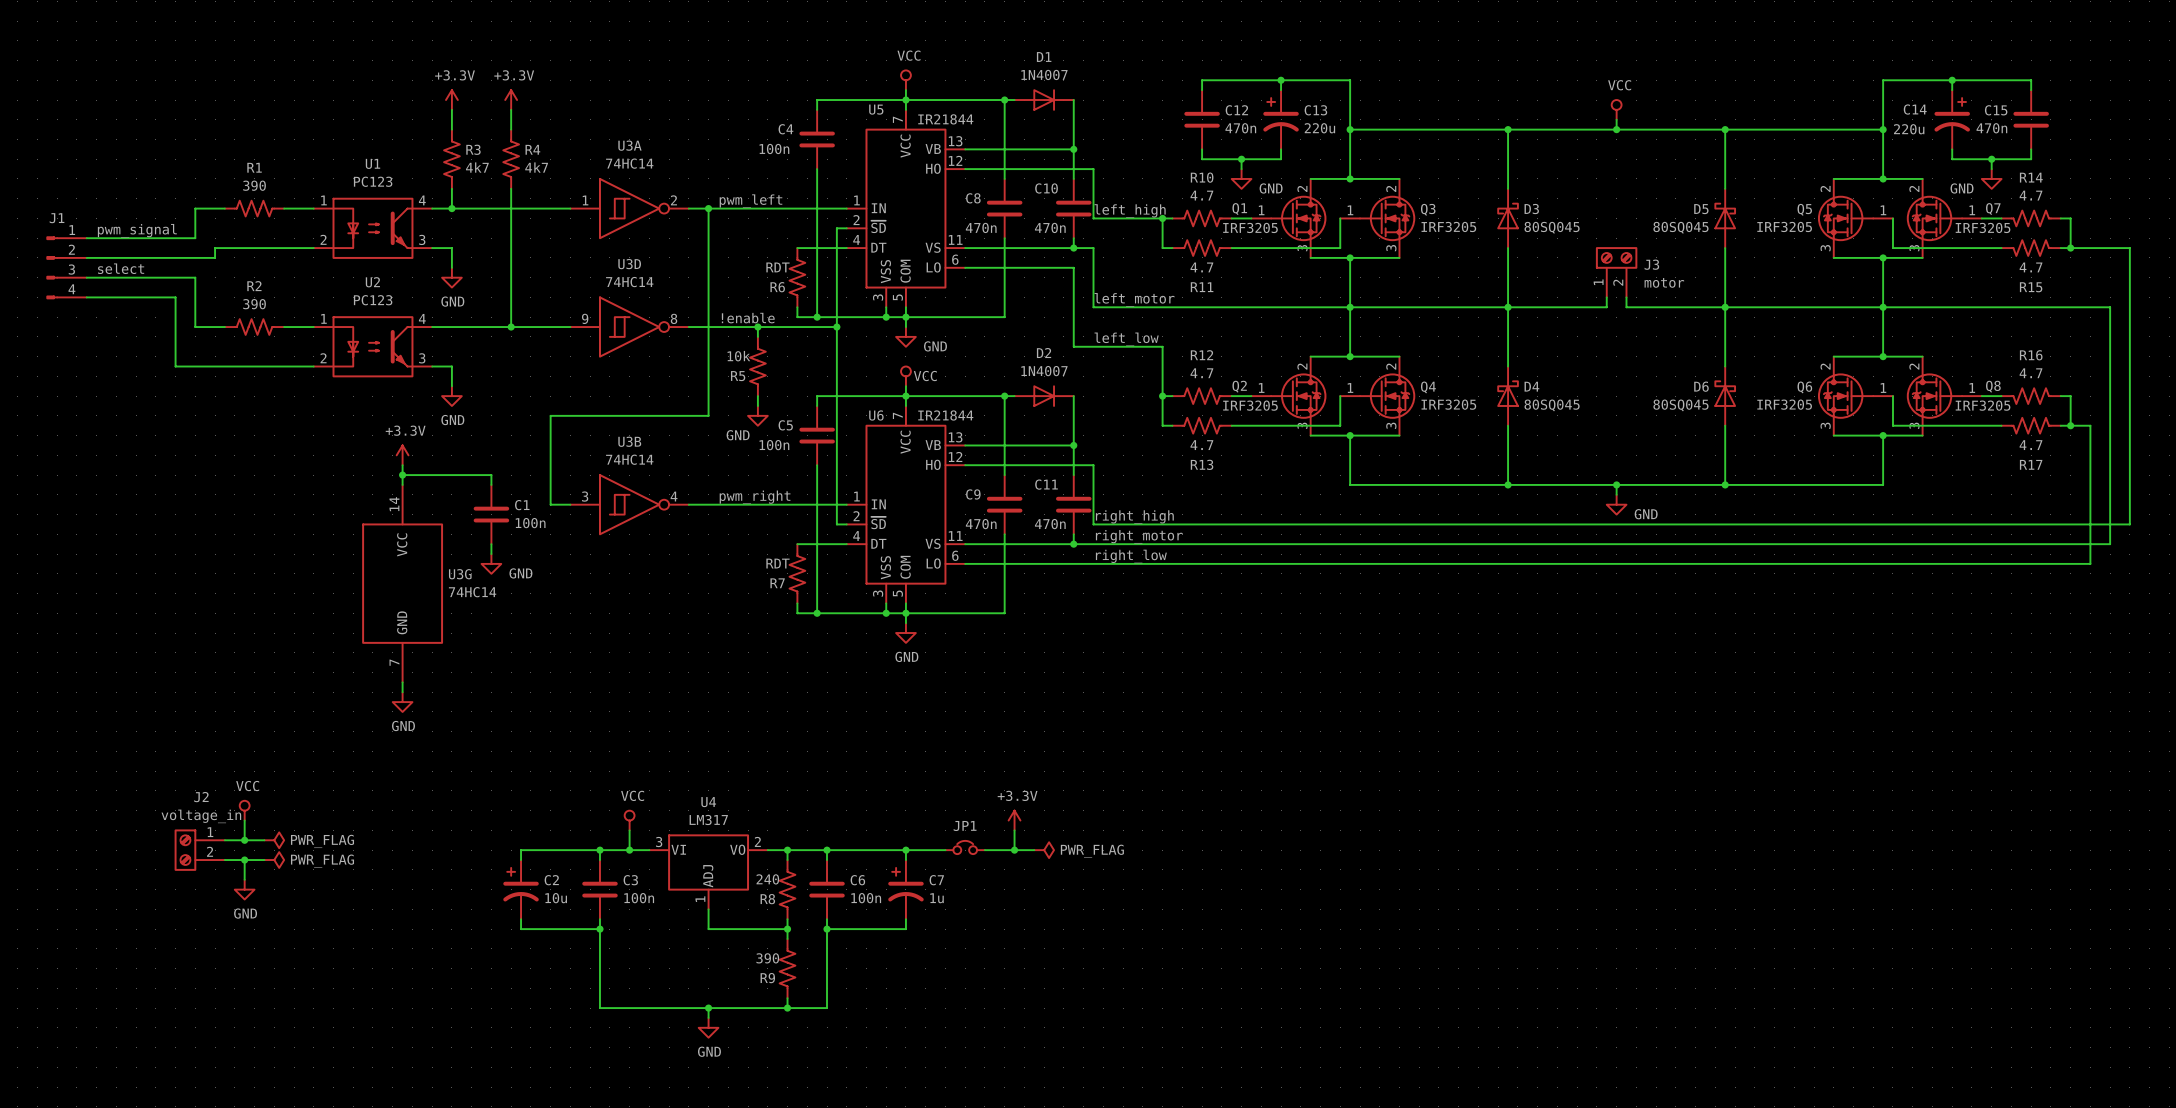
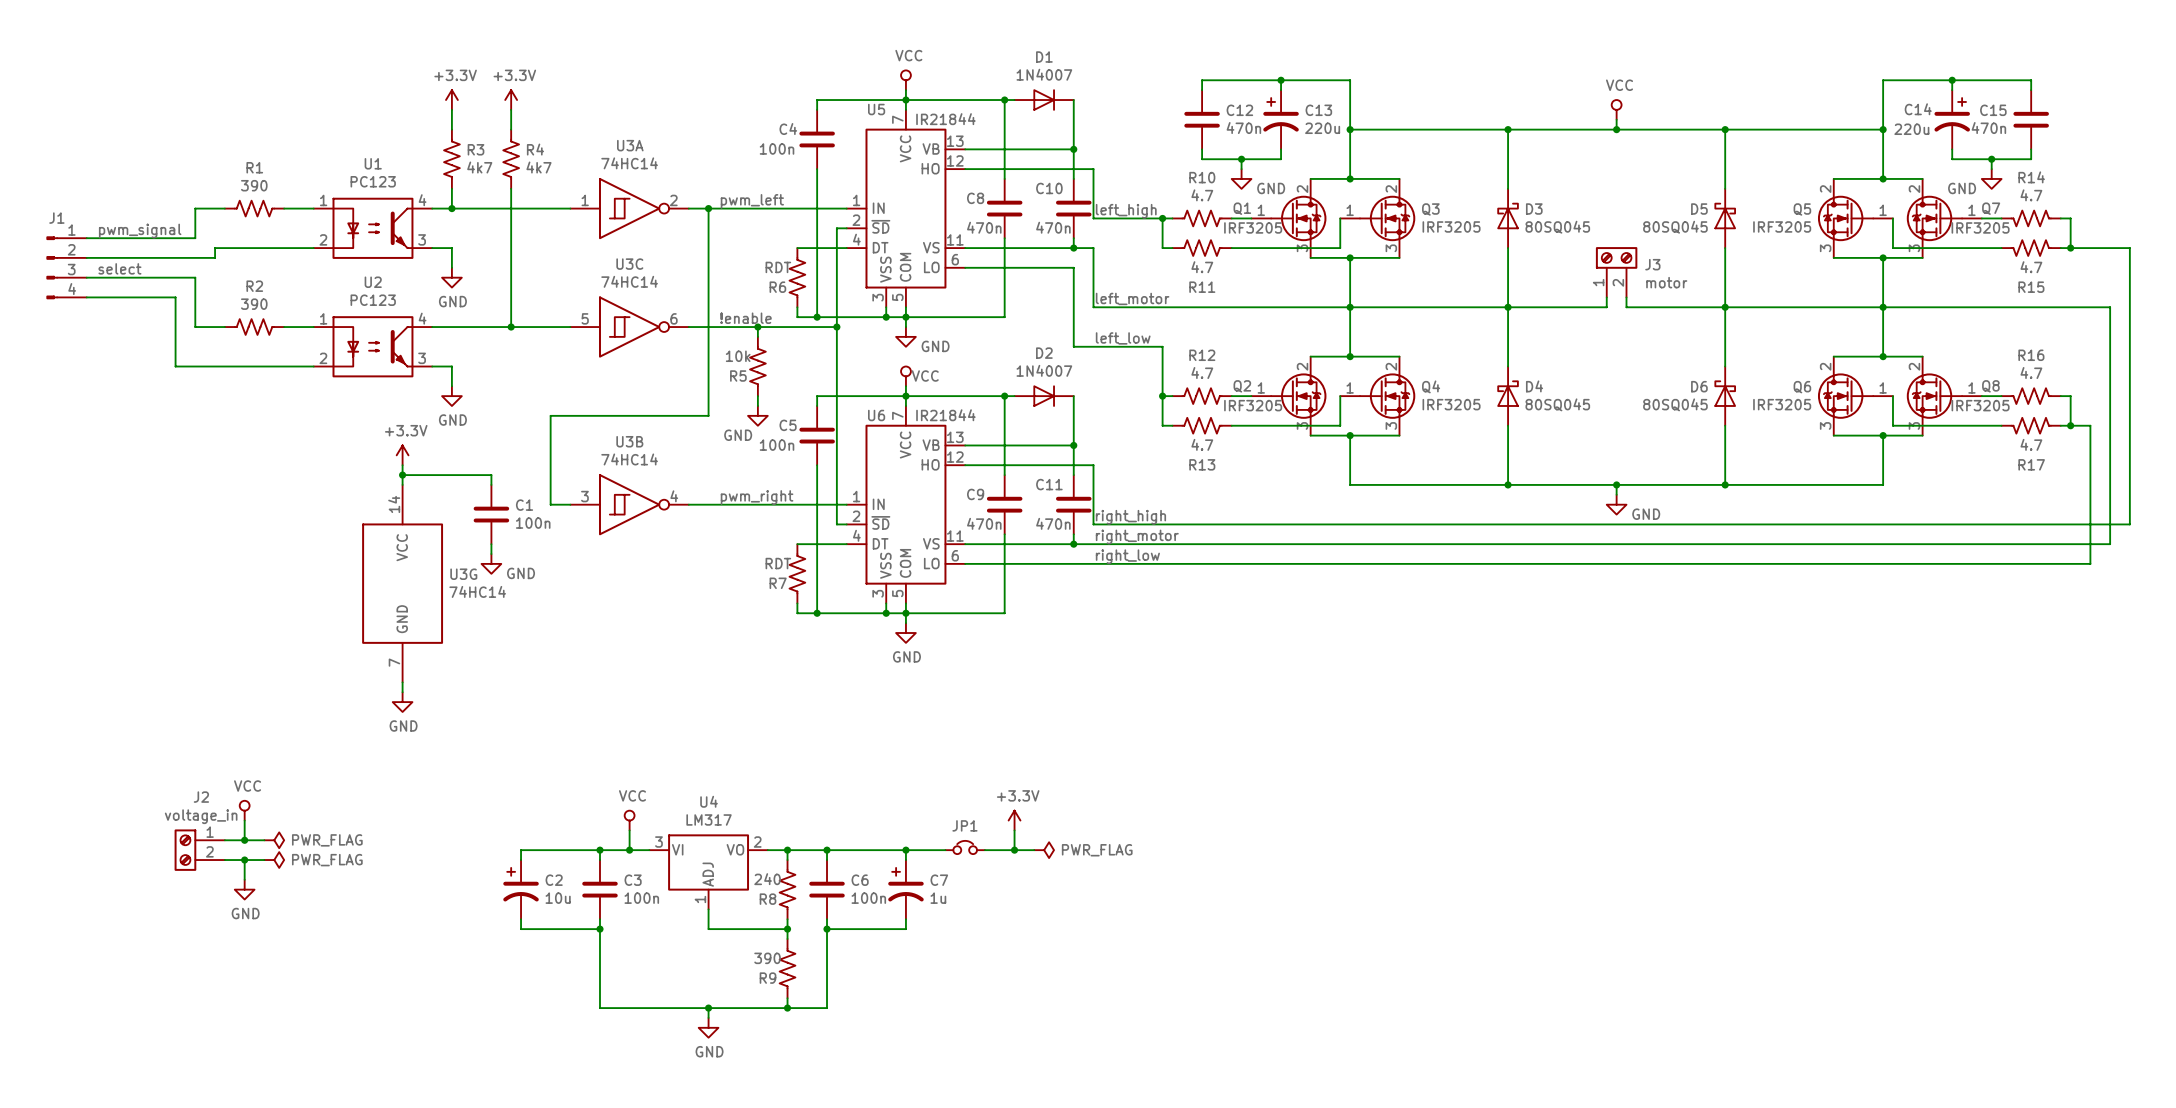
U3D name: U3D (629, 264) -> U3C (629, 264)
U3D pin number: 9 (585, 318) -> 5 (585, 318)
U3D pin number: 8 (674, 318) -> 6 (674, 318)

